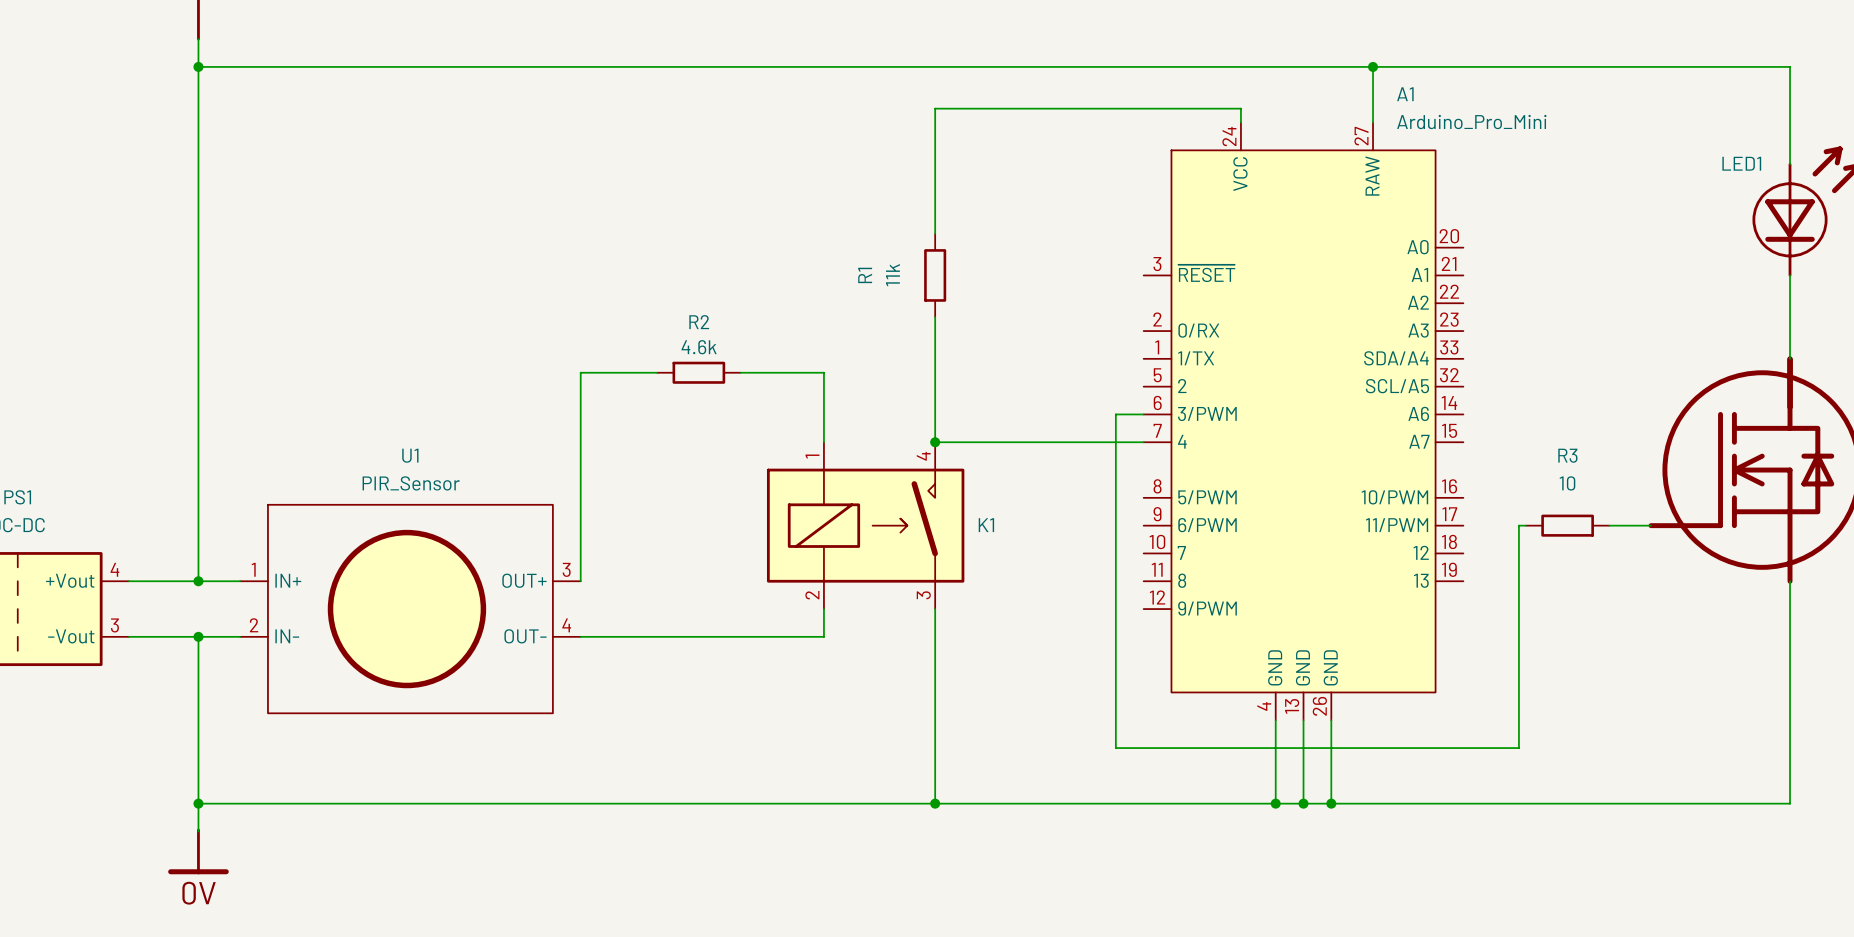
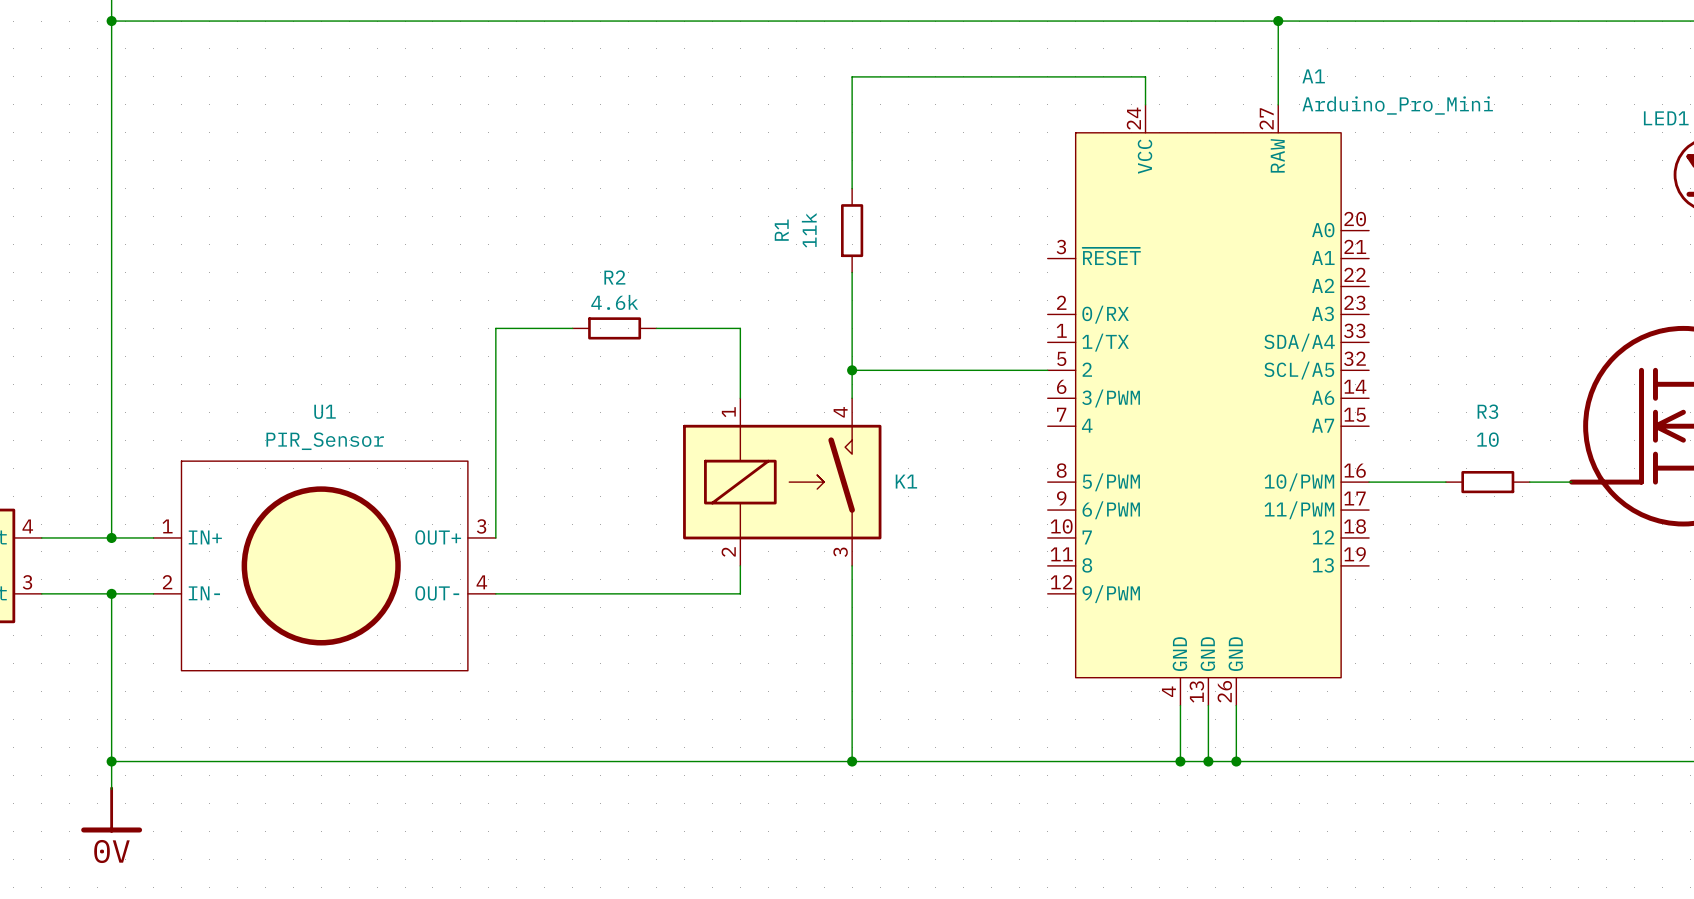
wire: none -> (1278, 21) (1278, 104)
wire: (1373, 66) (1373, 122) -> none
junction position: (1373, 66) -> (1278, 21)
wire: (935, 122) (935, 108) (1240, 108) (1240, 122) -> (852, 76) (1145, 76) (1145, 104)
wire: none -> (852, 370) (1033, 370)
wire: (1115, 414) (1115, 748) (1518, 748) (1518, 525) -> (1369, 482) (1438, 482)
A1 position: (1303, 421) -> (1208, 405)
wire: (935, 442) (1143, 442) -> none
junction position: (935, 442) -> (852, 370)
wire: (1275, 720) (1275, 803) -> none
wire: (1303, 720) (1303, 803) -> none
wire: (1331, 720) (1331, 803) -> none
wire: none -> (1180, 705) (1180, 761)
wire: none -> (1208, 705) (1208, 761)
wire: none -> (1236, 705) (1236, 761)
junction: none -> (1180, 761)
junction: (1275, 803) -> none
junction: none -> (1208, 761)
junction: (1303, 803) -> none
junction: none -> (1236, 761)
junction: (1331, 803) -> none

